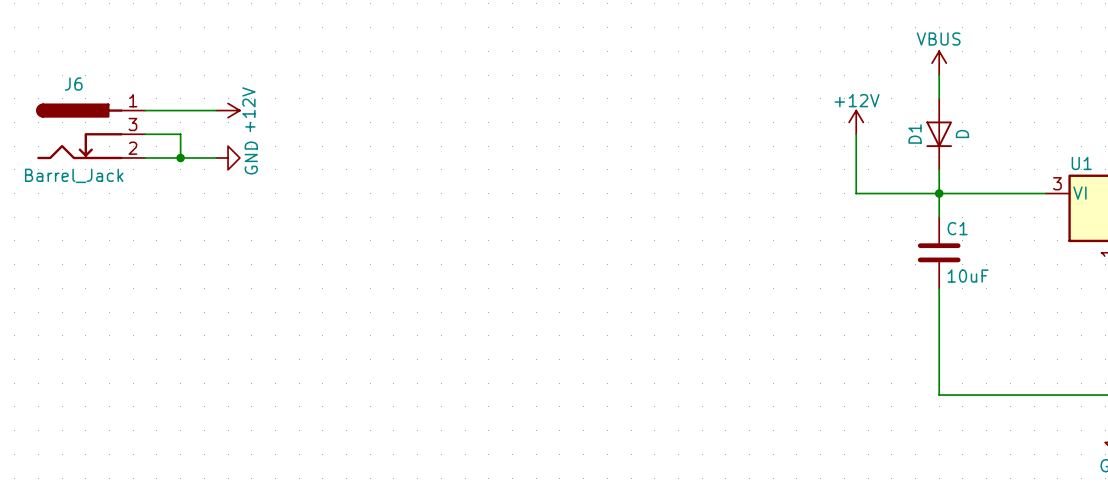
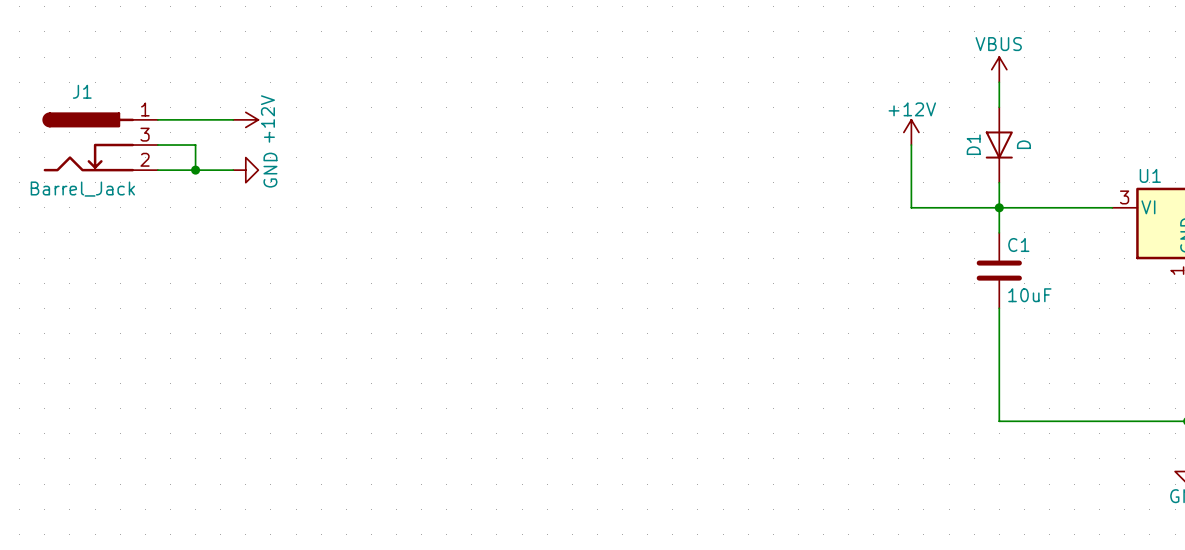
J6 name: J6 (73, 84) -> J1 (82, 91)

